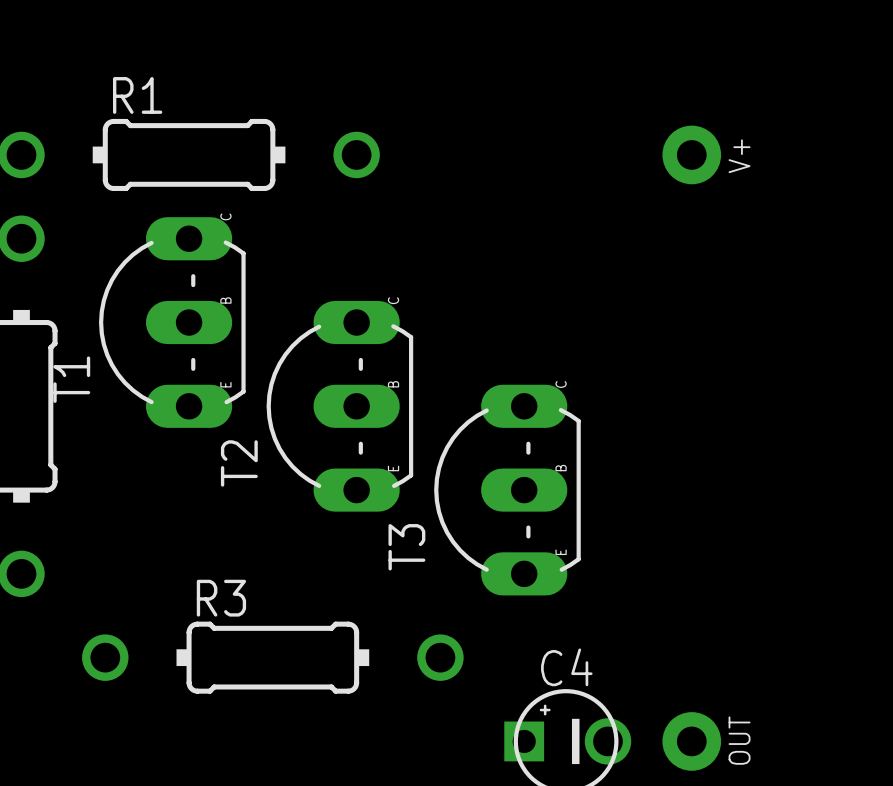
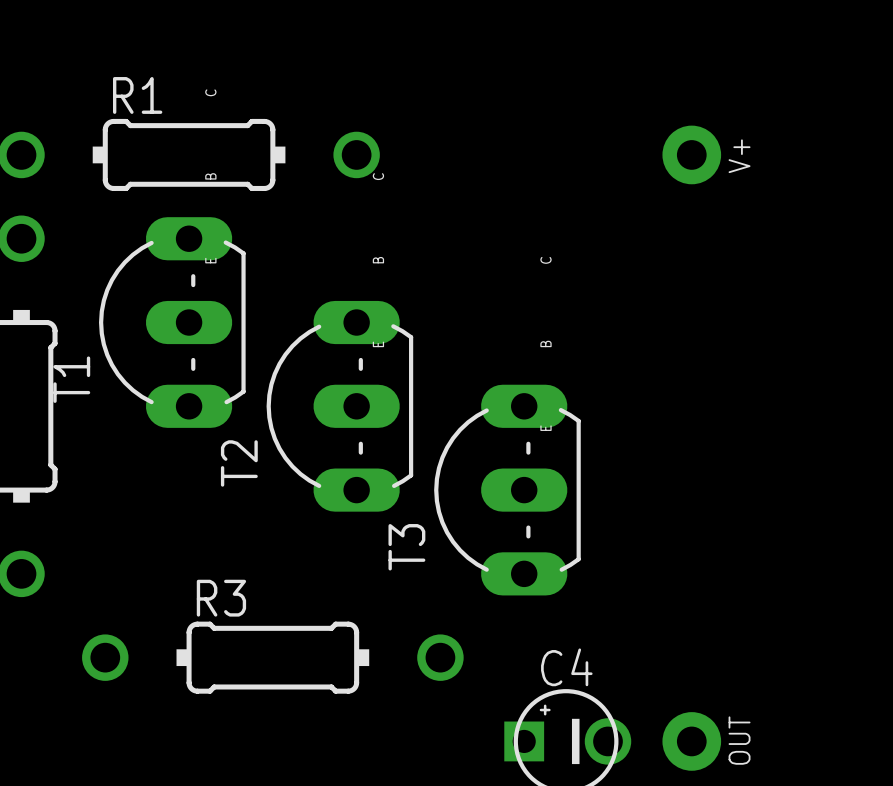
T1 text: none -> C (210, 92)
T1 text: none -> B (210, 176)
T2 text: none -> C (378, 176)
T1 text: C (225, 216) -> none
T1 text: none -> E (210, 260)
T2 text: none -> B (378, 260)
T3 text: none -> C (545, 260)
T1 text: B (225, 300) -> none
T2 text: C (393, 300) -> none
T3 text: none -> B (545, 343)
T2 text: none -> E (378, 344)
T1 text: E (225, 384) -> none
T2 text: B (393, 384) -> none
T3 text: C (561, 384) -> none
T3 text: none -> E (545, 428)
T2 text: E (393, 468) -> none
T3 text: B (561, 468) -> none
T3 text: E (561, 552) -> none

